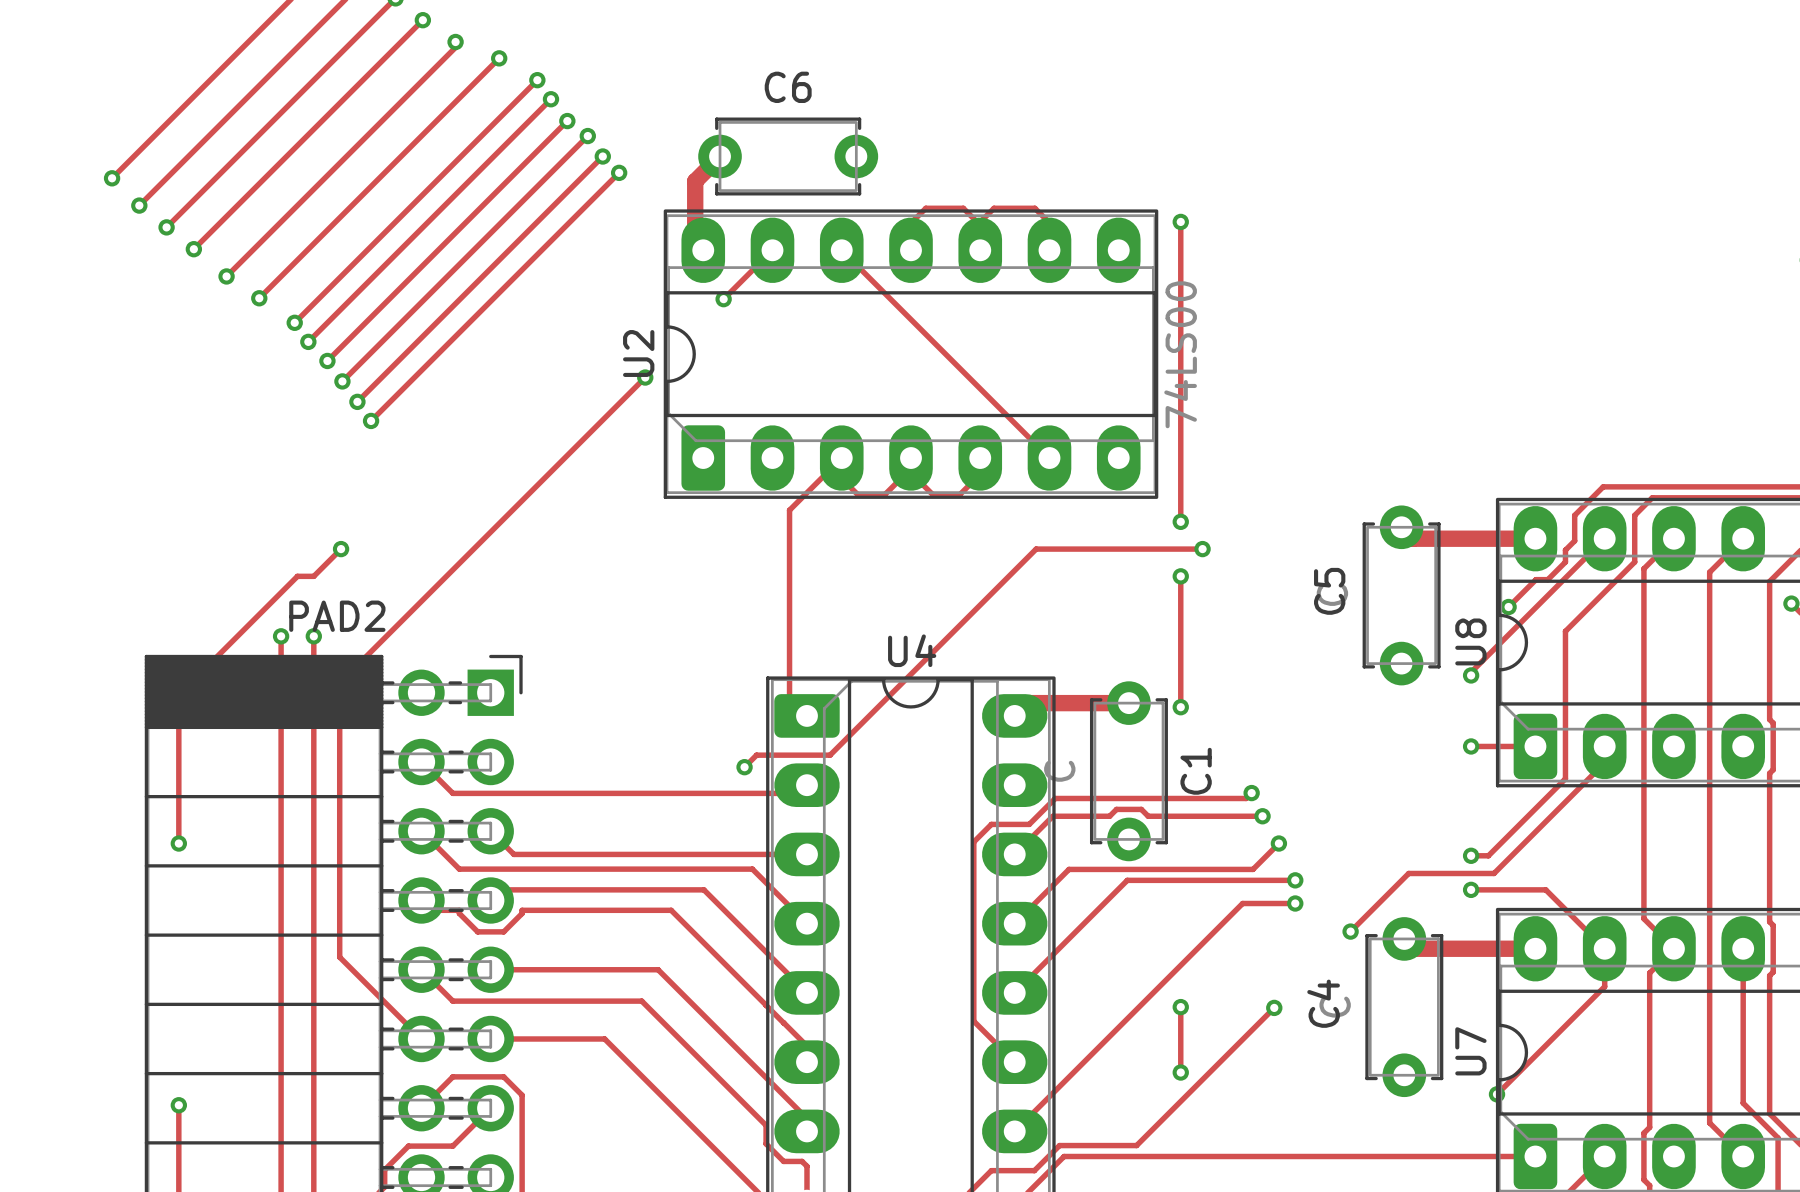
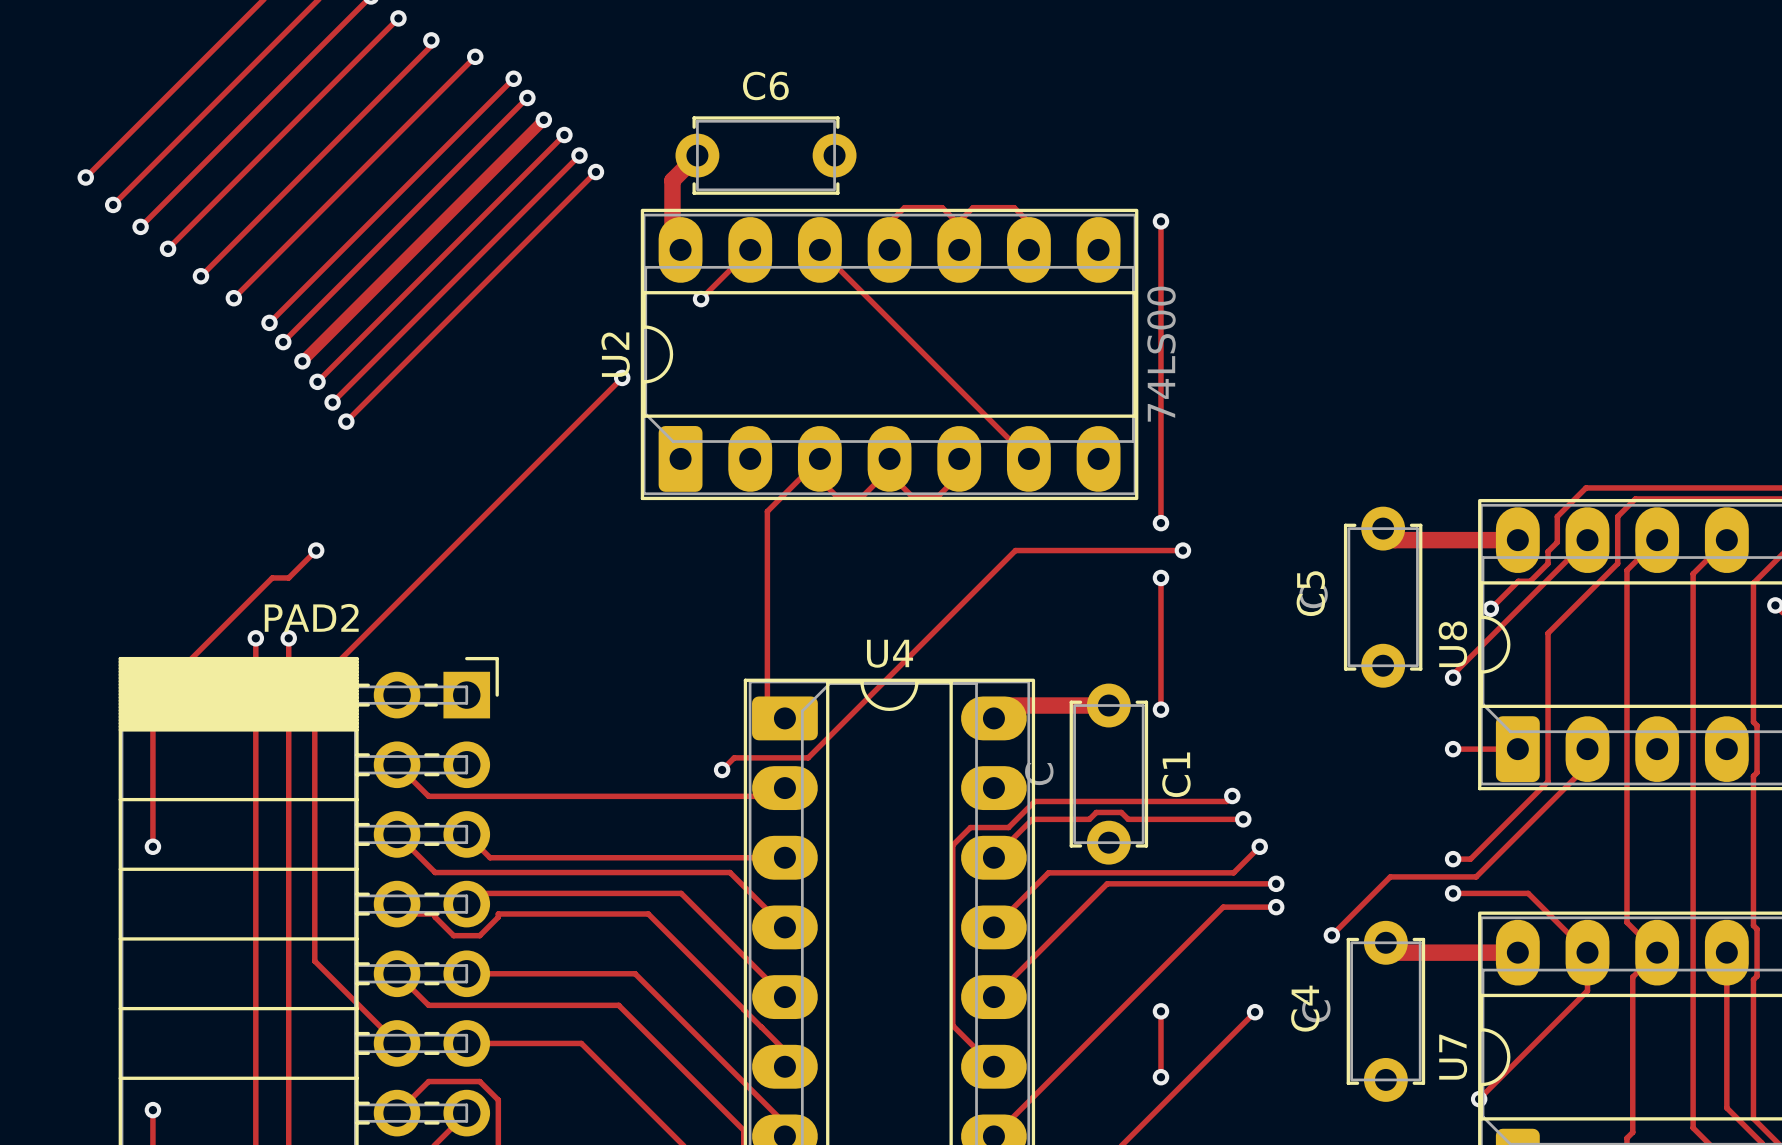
track width: thin (567, 121) (327, 360) -> thick (543, 119) (302, 361)

